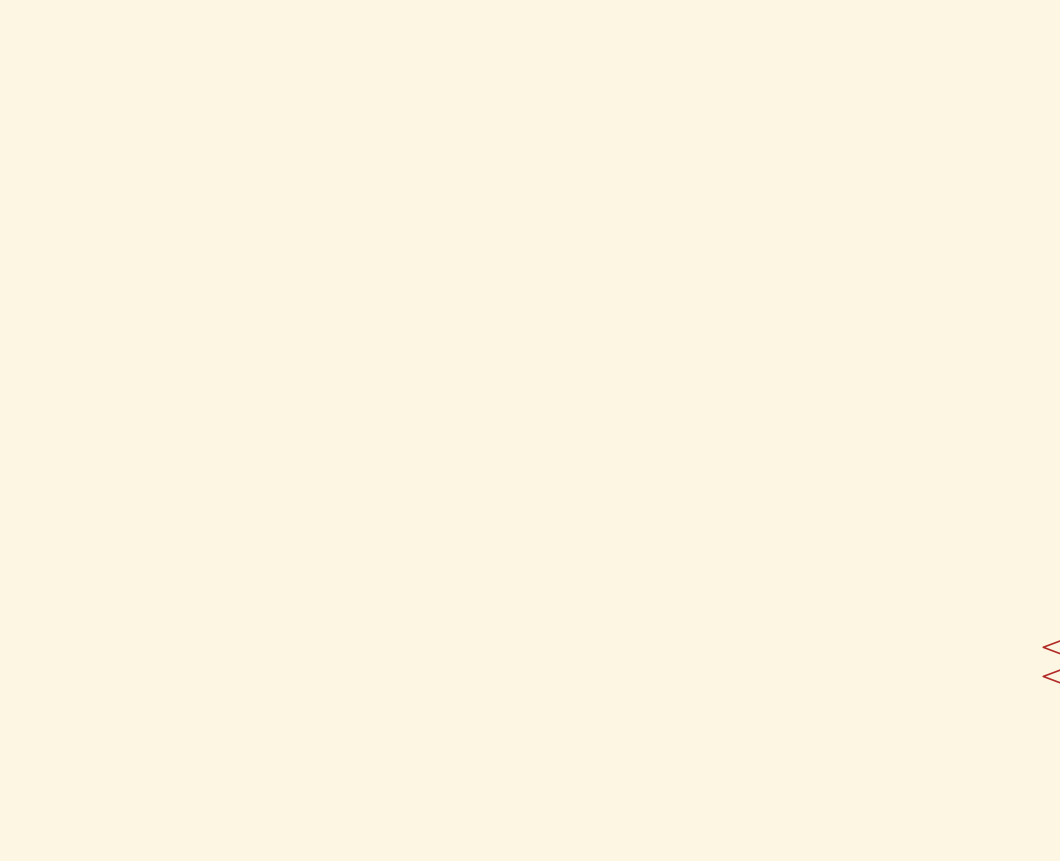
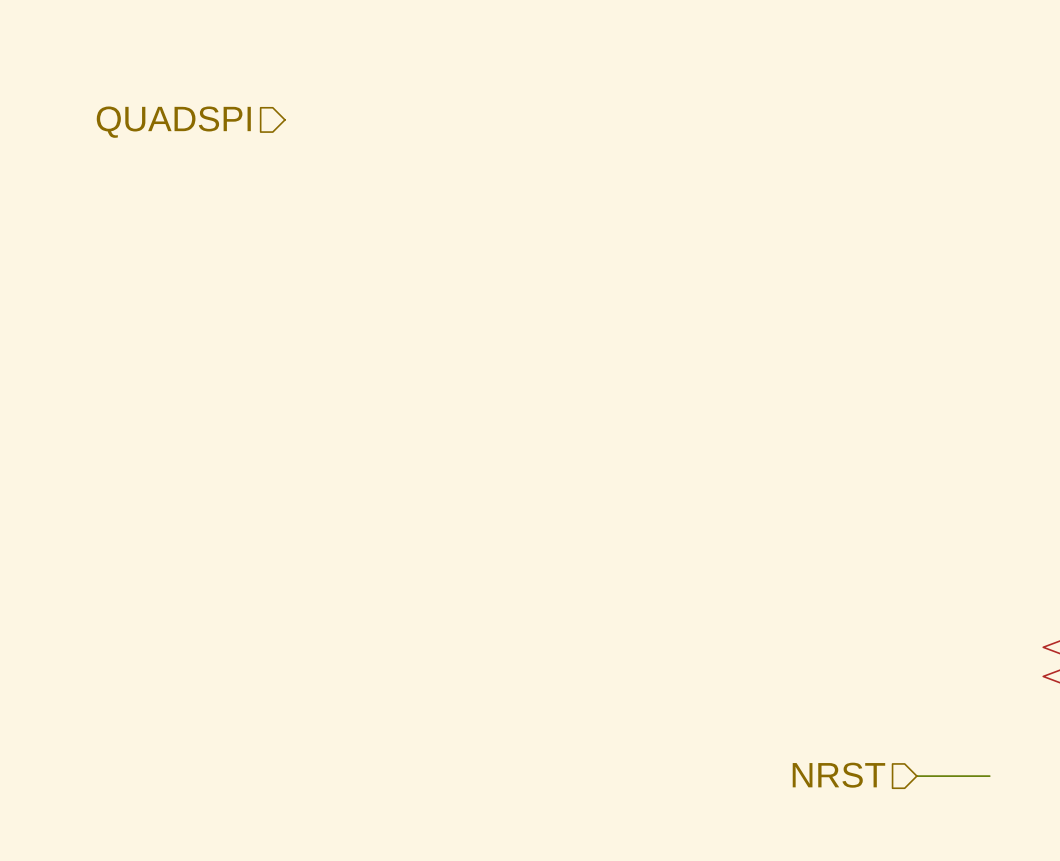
hierarchical label: none -> QUADSPI (173, 122)
hierarchical label: none -> NRST (838, 775)
wire: none -> (916, 776) (989, 776)

